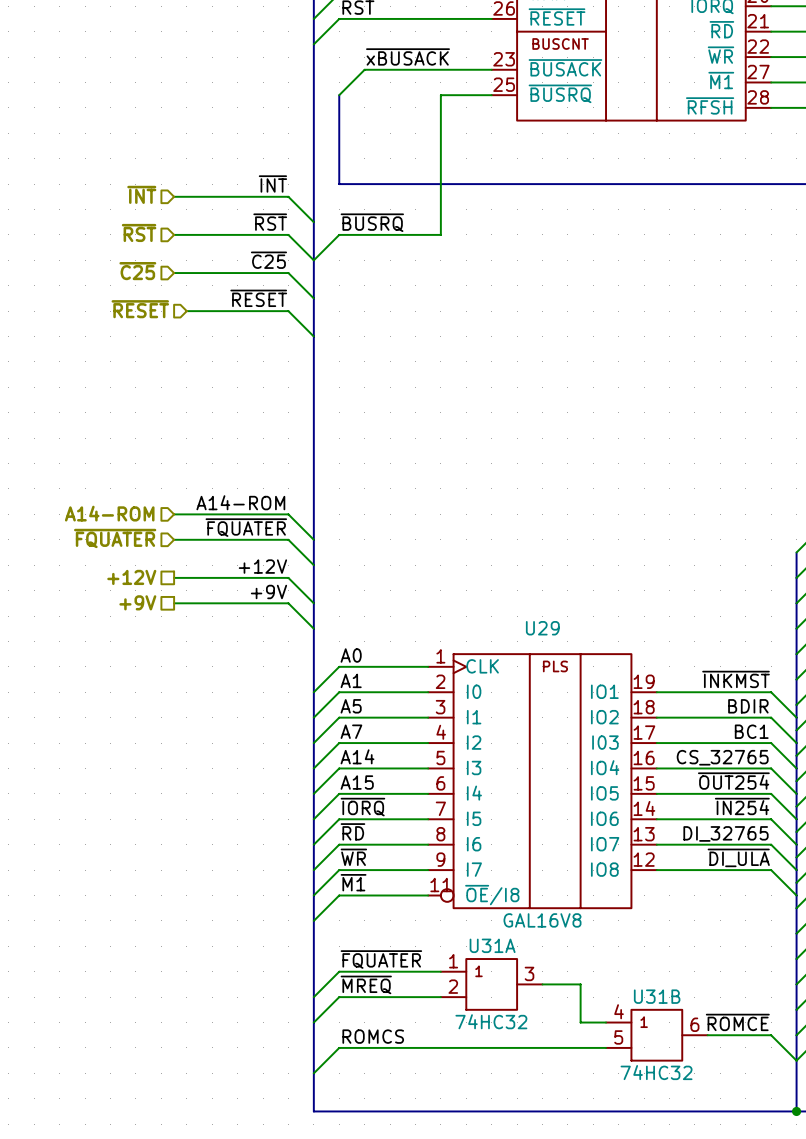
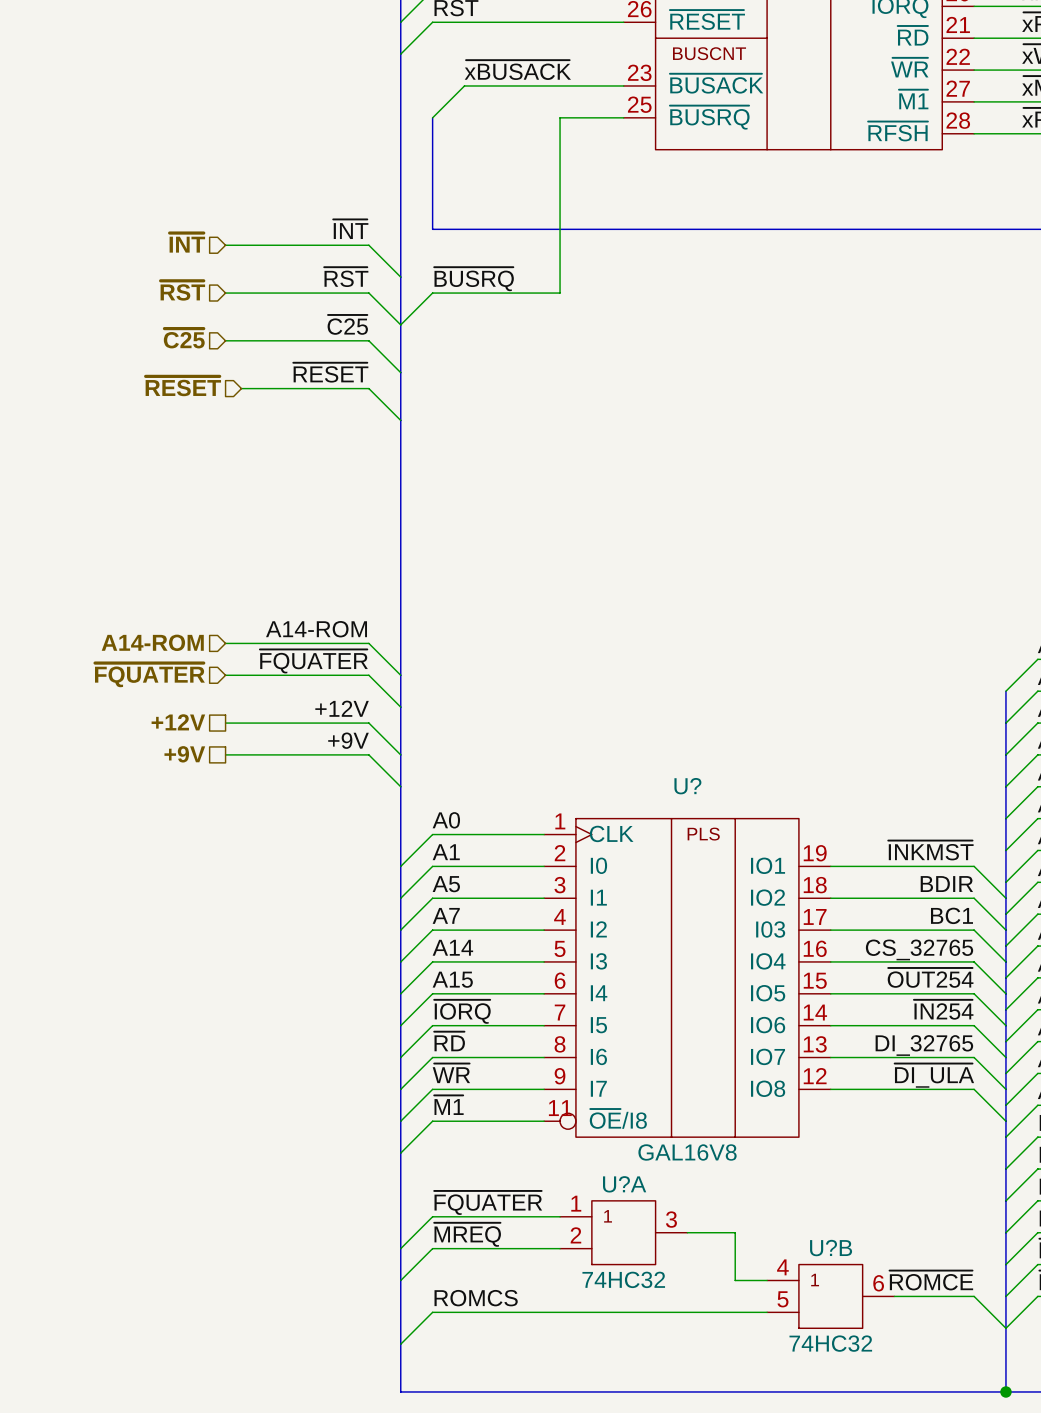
U29 name: U29 (542, 628) -> U? (687, 786)
U31A name: U31A (492, 945) -> U?A (624, 1184)
U31B name: U31B (657, 996) -> U?B (831, 1248)

